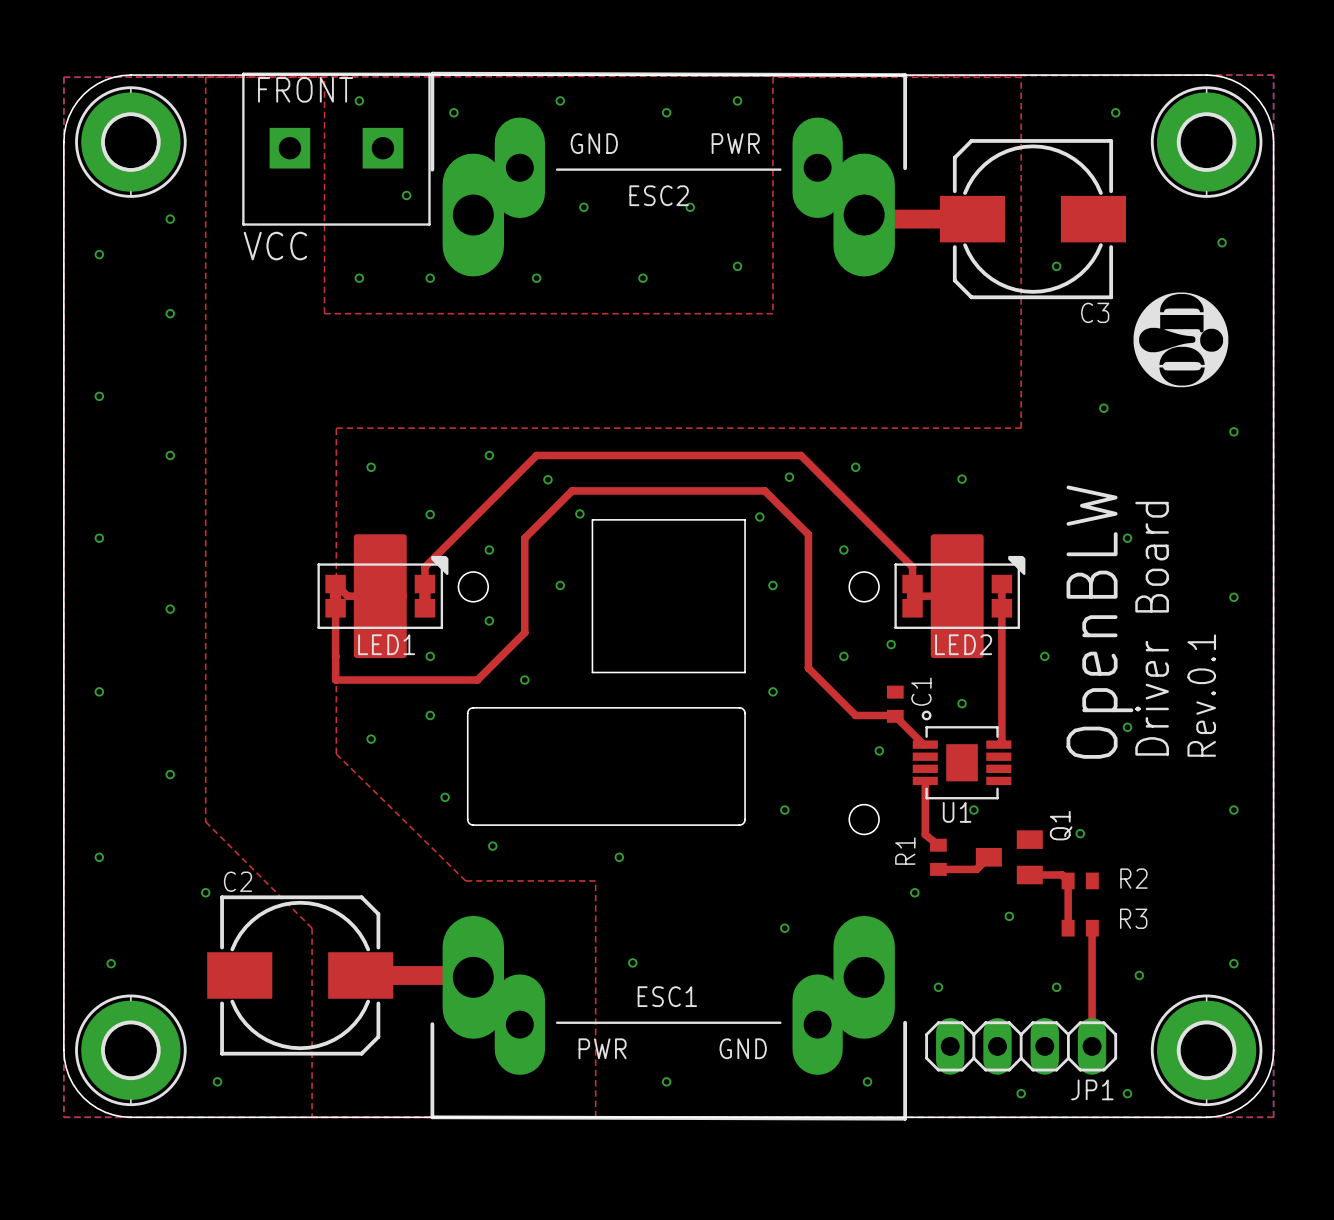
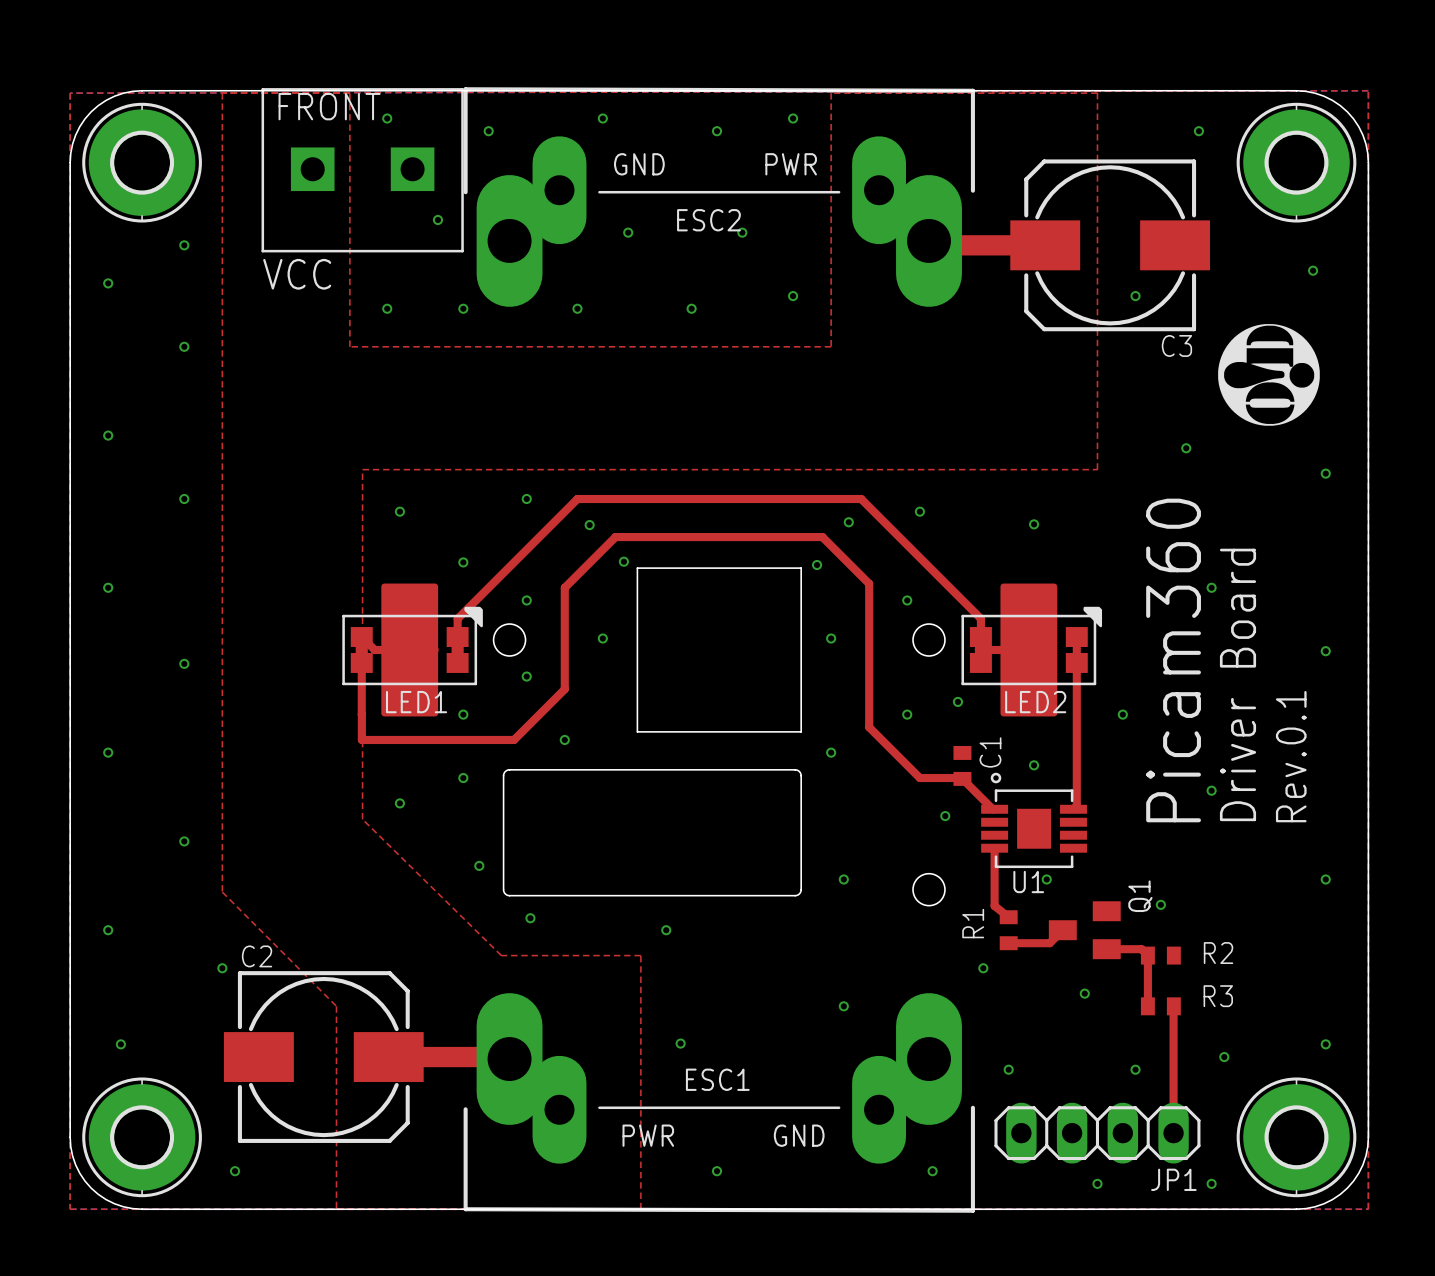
text: OpenBLW (1099, 622) -> Picam360 (1173, 660)

